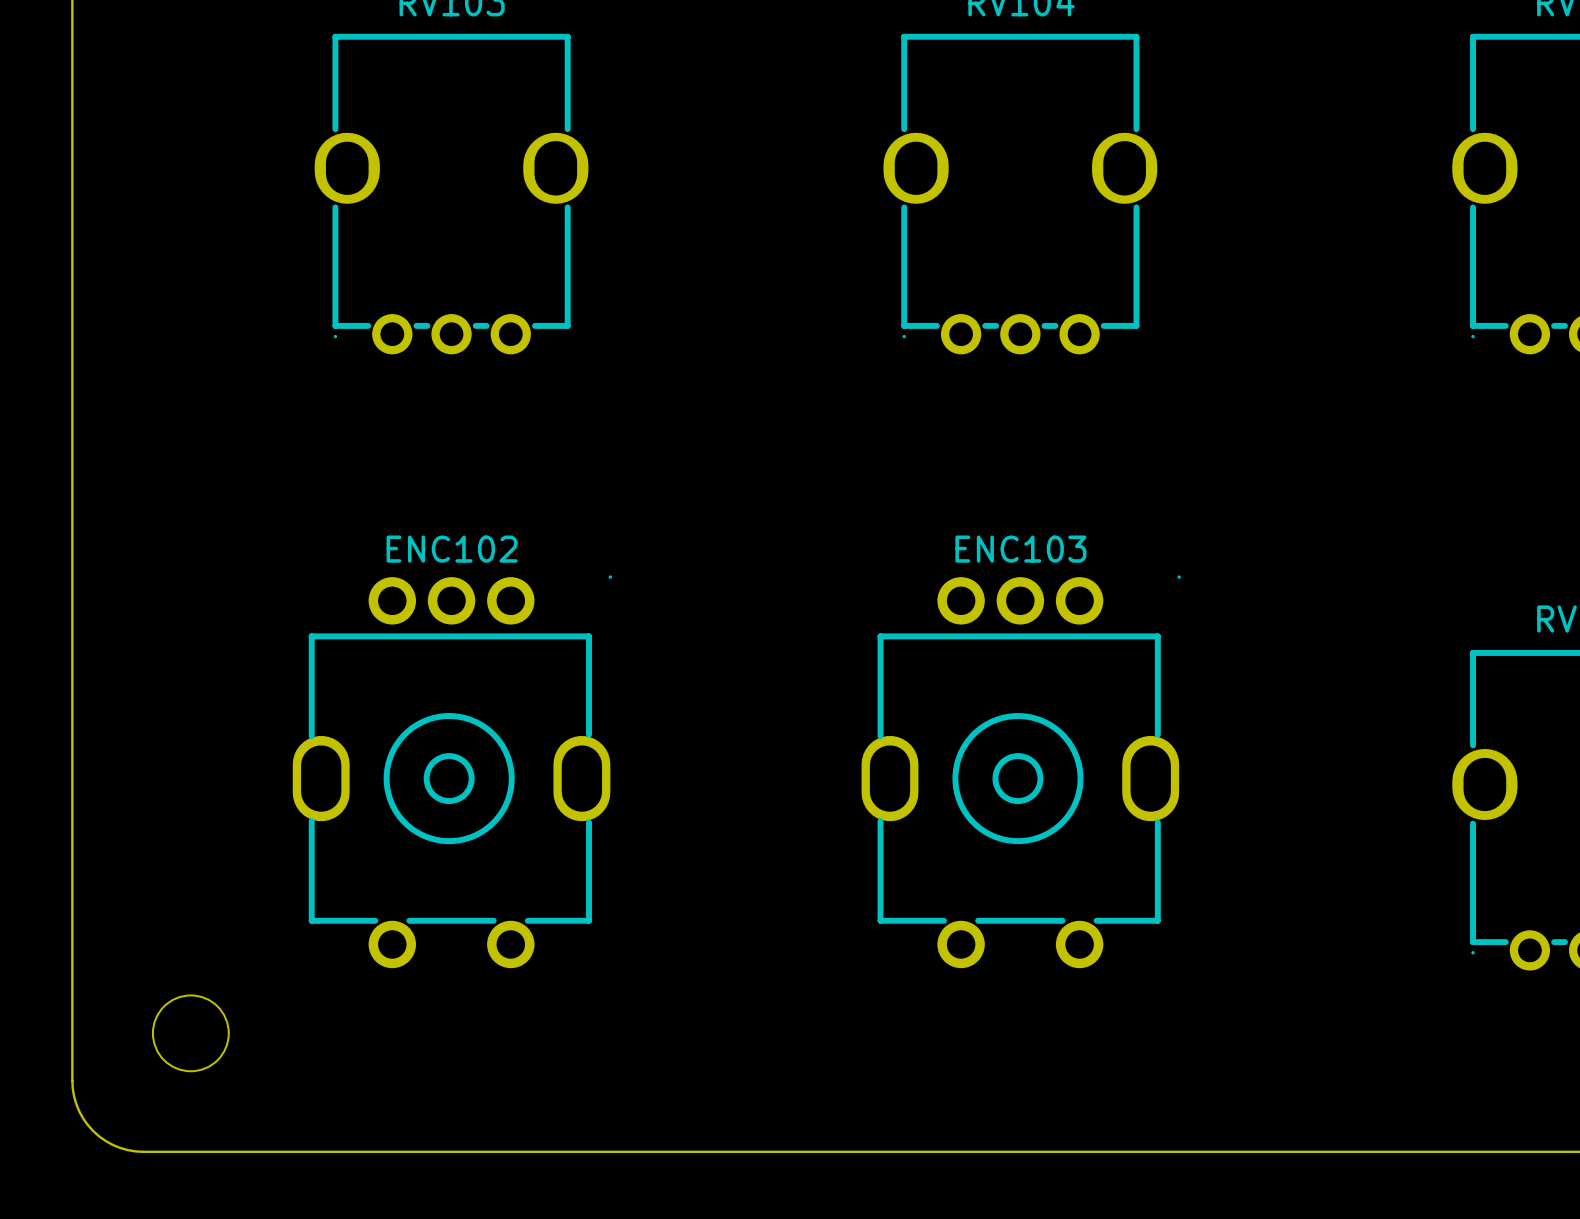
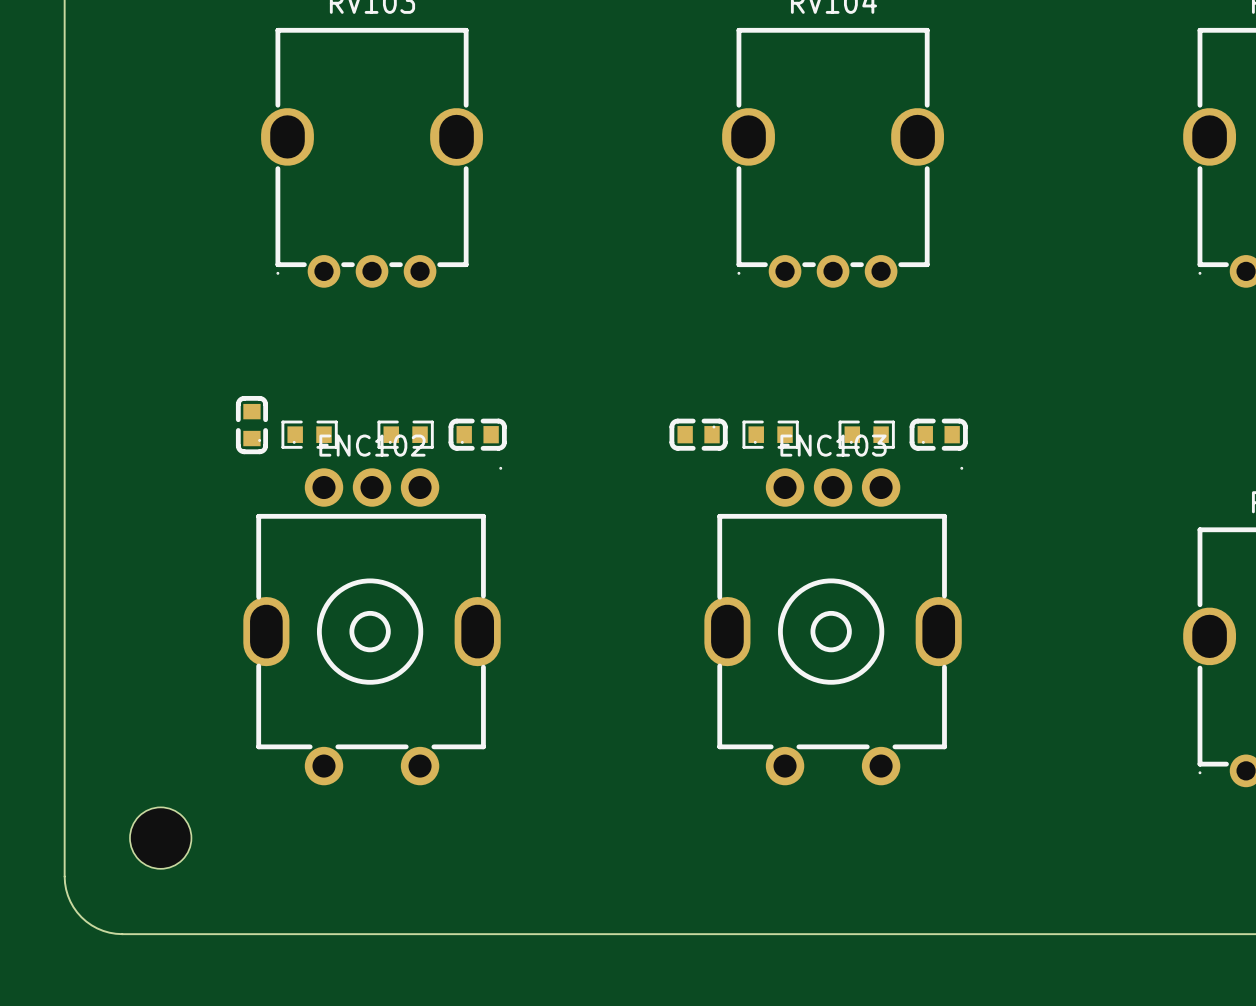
part: none -> (251, 425)
part: none -> (309, 434)
part: none -> (405, 434)
part: none -> (477, 434)
part: none -> (698, 434)
part: none -> (770, 434)
part: none -> (866, 434)
part: none -> (938, 434)

